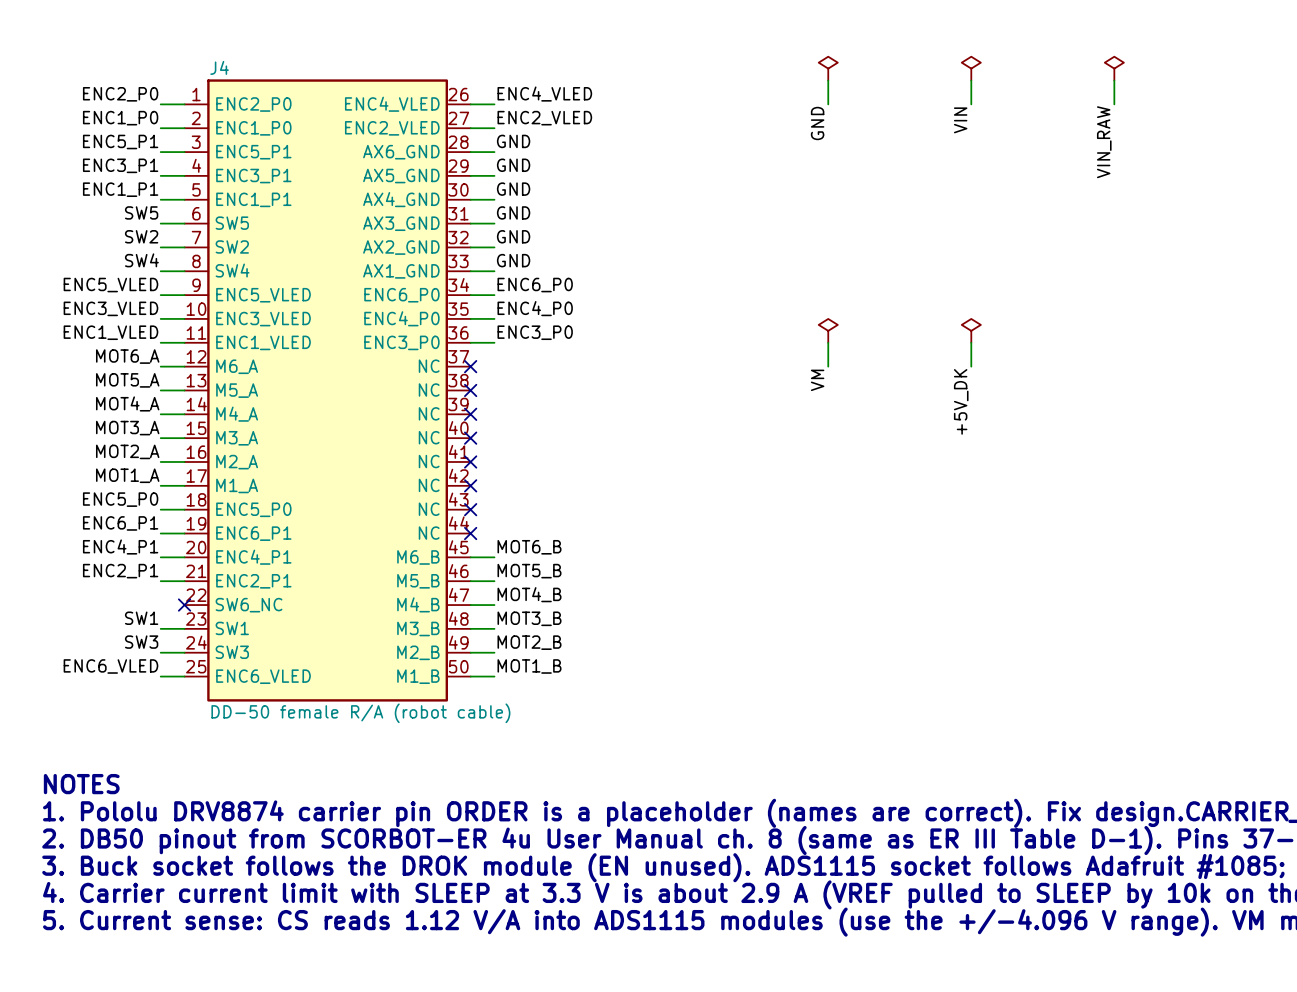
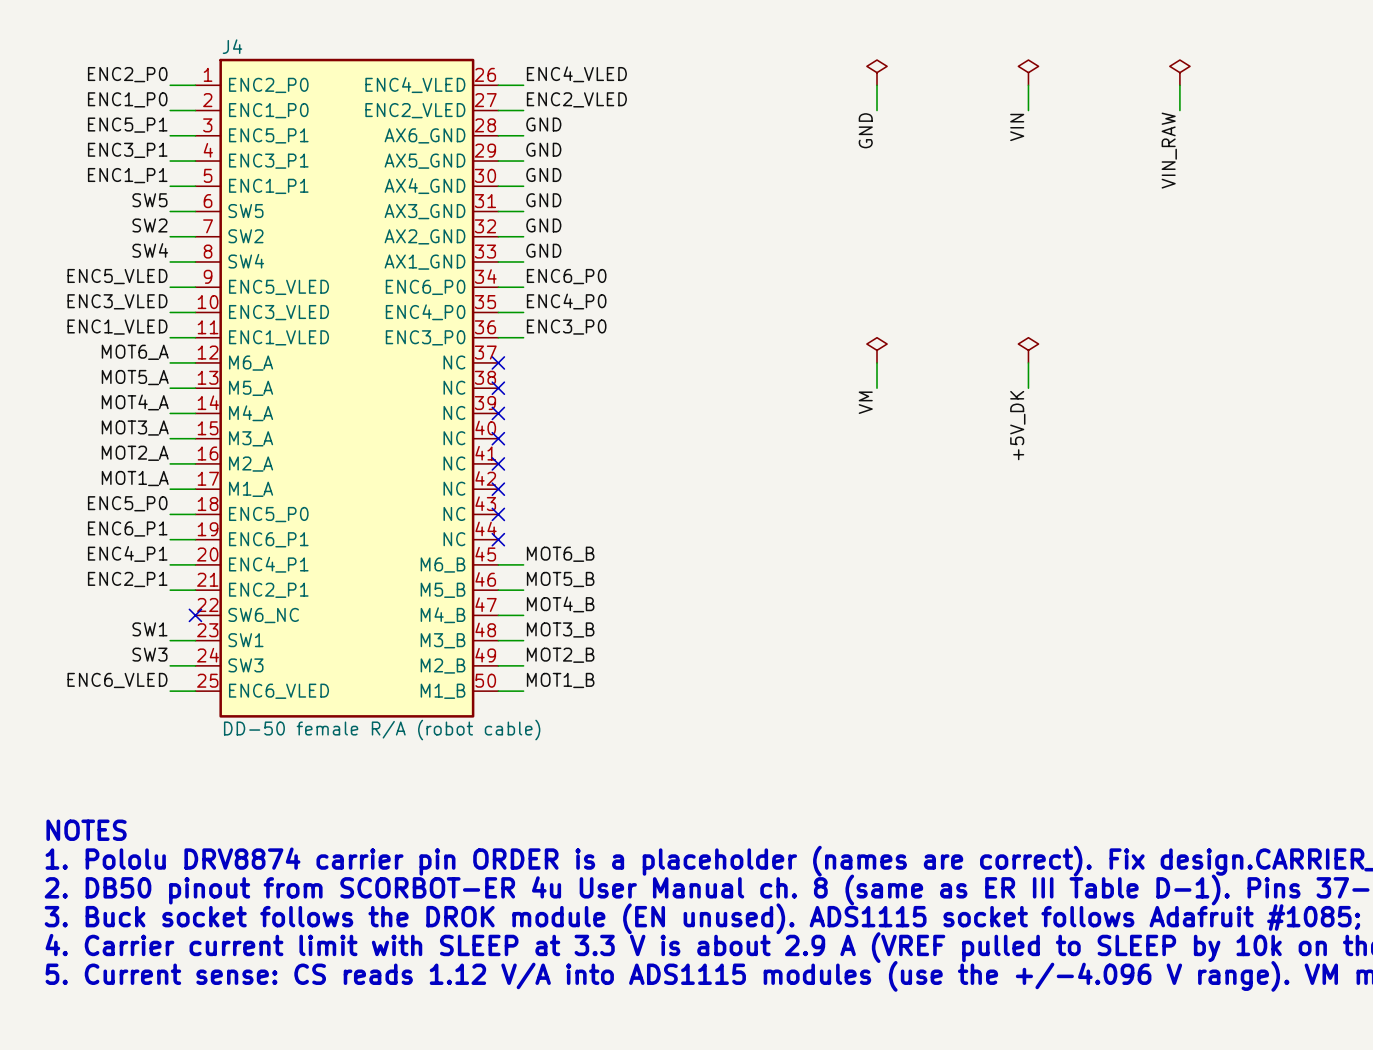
label: none -> ENC2_P0 (127, 74)
label: none -> ENC4_VLED (576, 74)
wire: none -> (170, 85) (195, 85)
wire: none -> (498, 85) (523, 85)
label: ENC2_P0 (120, 94) -> ENC1_P0 (127, 99)
label: ENC4_VLED (544, 94) -> ENC2_VLED (576, 99)
label: ENC1_P0 (120, 118) -> ENC5_P1 (127, 125)
label: ENC2_VLED (544, 118) -> GND (543, 124)
label: ENC5_P1 (120, 141) -> ENC3_P1 (127, 150)
label: ENC3_P1 (120, 165) -> ENC1_P1 (127, 175)
label: ENC1_P1 (120, 189) -> SW5 (149, 200)
label: SW5 (141, 212) -> SW2 (149, 225)
label: SW2 (141, 236) -> SW4 (150, 250)
label: SW4 (141, 260) -> ENC5_VLED (117, 276)
label: GND (513, 260) -> ENC6_P0 (566, 276)
label: ENC5_VLED (110, 285) -> ENC3_VLED (117, 301)
label: ENC6_P0 (535, 285) -> ENC4_P0 (566, 301)
label: ENC3_VLED (110, 308) -> ENC1_VLED (117, 327)
label: ENC4_P0 (535, 308) -> ENC3_P0 (566, 327)
label: ENC1_VLED (110, 332) -> MOT6_A (135, 352)
label: ENC3_P0 (535, 332) -> none
wire: (470, 342) (494, 342) -> none
no-connect mark: none -> (498, 362)
label: MOT6_A (127, 356) -> MOT5_A (135, 377)
label: MOT5_A (127, 380) -> MOT4_A (135, 402)
J4 position: (327, 390) -> (346, 388)
label: MOT4_A (127, 403) -> MOT3_A (135, 428)
label: MOT3_A (127, 428) -> MOT2_A (135, 453)
label: MOT2_A (127, 451) -> MOT1_A (135, 478)
label: MOT1_A (127, 475) -> ENC5_P0 (127, 503)
label: ENC5_P0 (120, 499) -> ENC6_P1 (127, 529)
label: ENC6_P1 (120, 523) -> ENC4_P1 (127, 553)
label: none -> MOT6_B (560, 554)
no-connect mark: (470, 533) -> none
label: ENC4_P1 (120, 547) -> ENC2_P1 (127, 579)
label: MOT6_B (529, 547) -> MOT5_B (560, 579)
label: ENC2_P1 (120, 571) -> none
label: MOT5_B (529, 571) -> MOT4_B (560, 604)
wire: (160, 581) (184, 581) -> (170, 640) (195, 640)
label: none -> SW1 (149, 629)
label: MOT4_B (529, 594) -> MOT3_B (560, 629)
no-connect mark position: (184, 605) -> (195, 615)
label: SW1 (141, 618) -> SW3 (149, 654)
label: MOT3_B (529, 618) -> MOT2_B (560, 655)
label: SW3 (141, 642) -> ENC6_VLED (117, 680)
label: MOT2_B (529, 642) -> MOT1_B (560, 680)
label: ENC6_VLED (110, 666) -> none
label: MOT1_B (529, 666) -> none
wire: (160, 676) (184, 676) -> none
wire: (470, 676) (494, 676) -> (498, 564) (523, 564)

